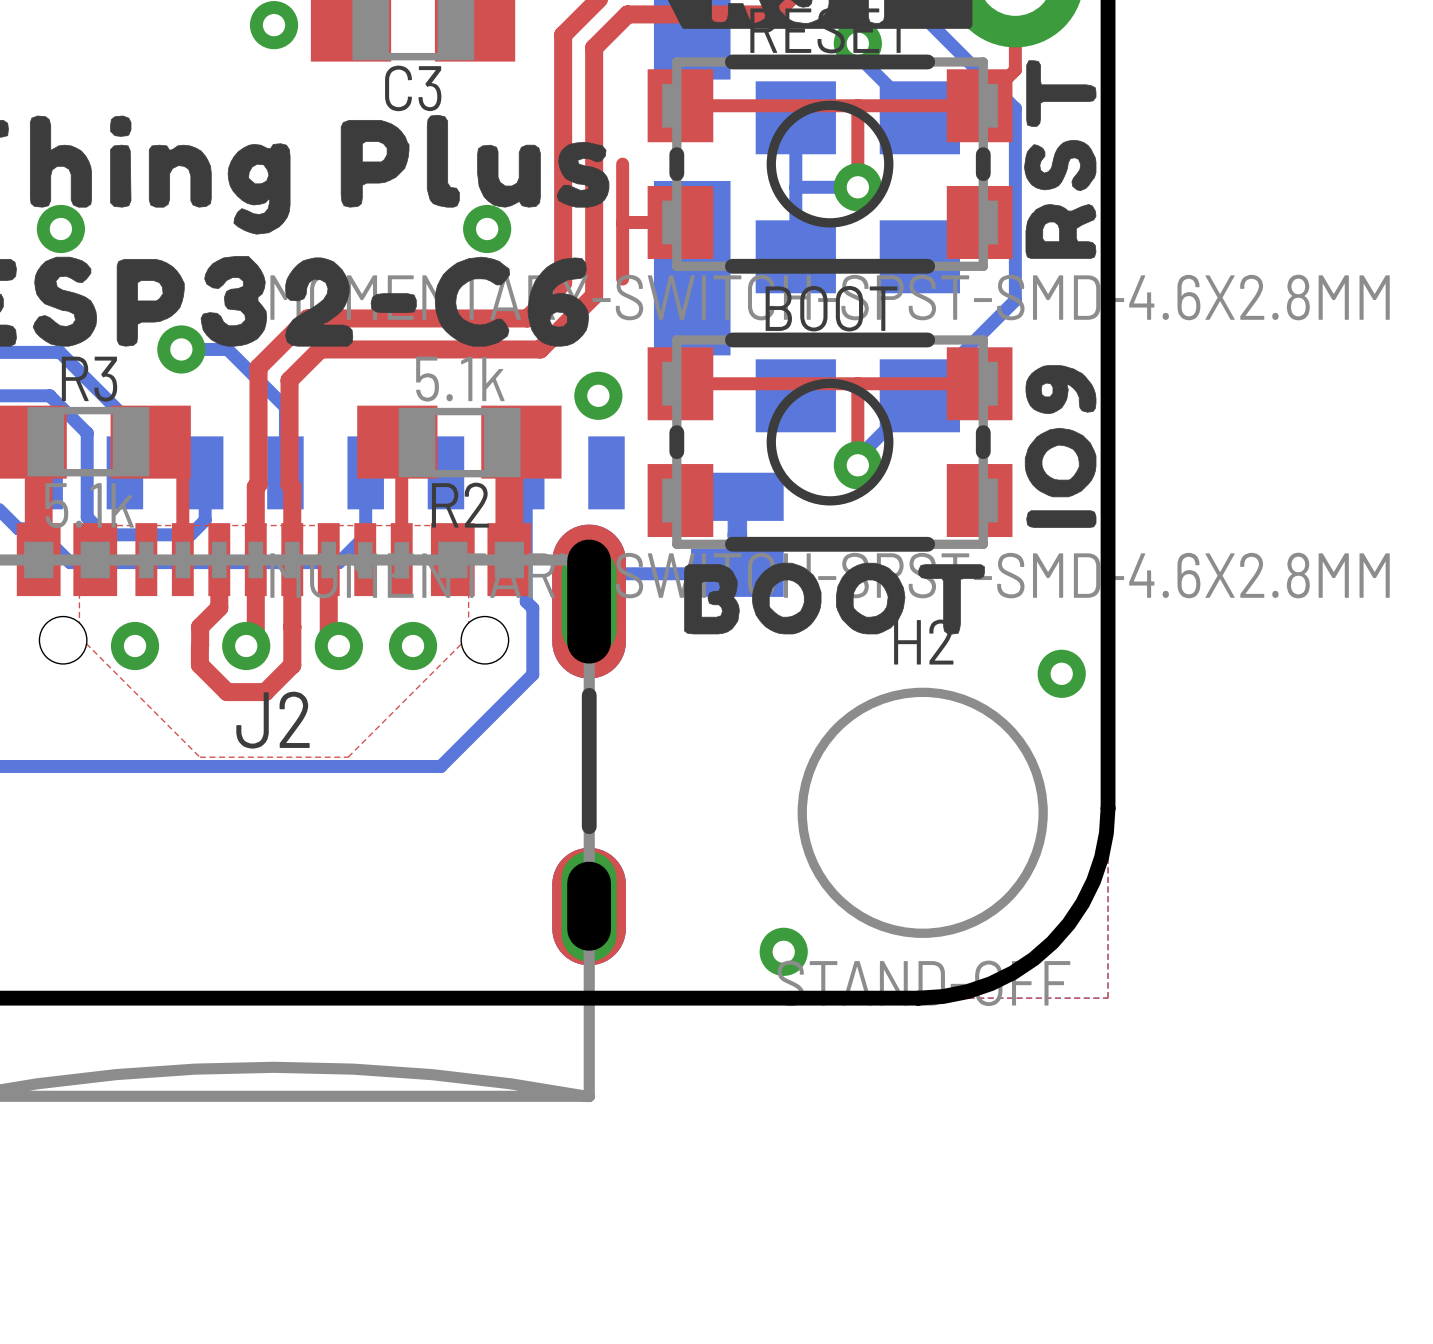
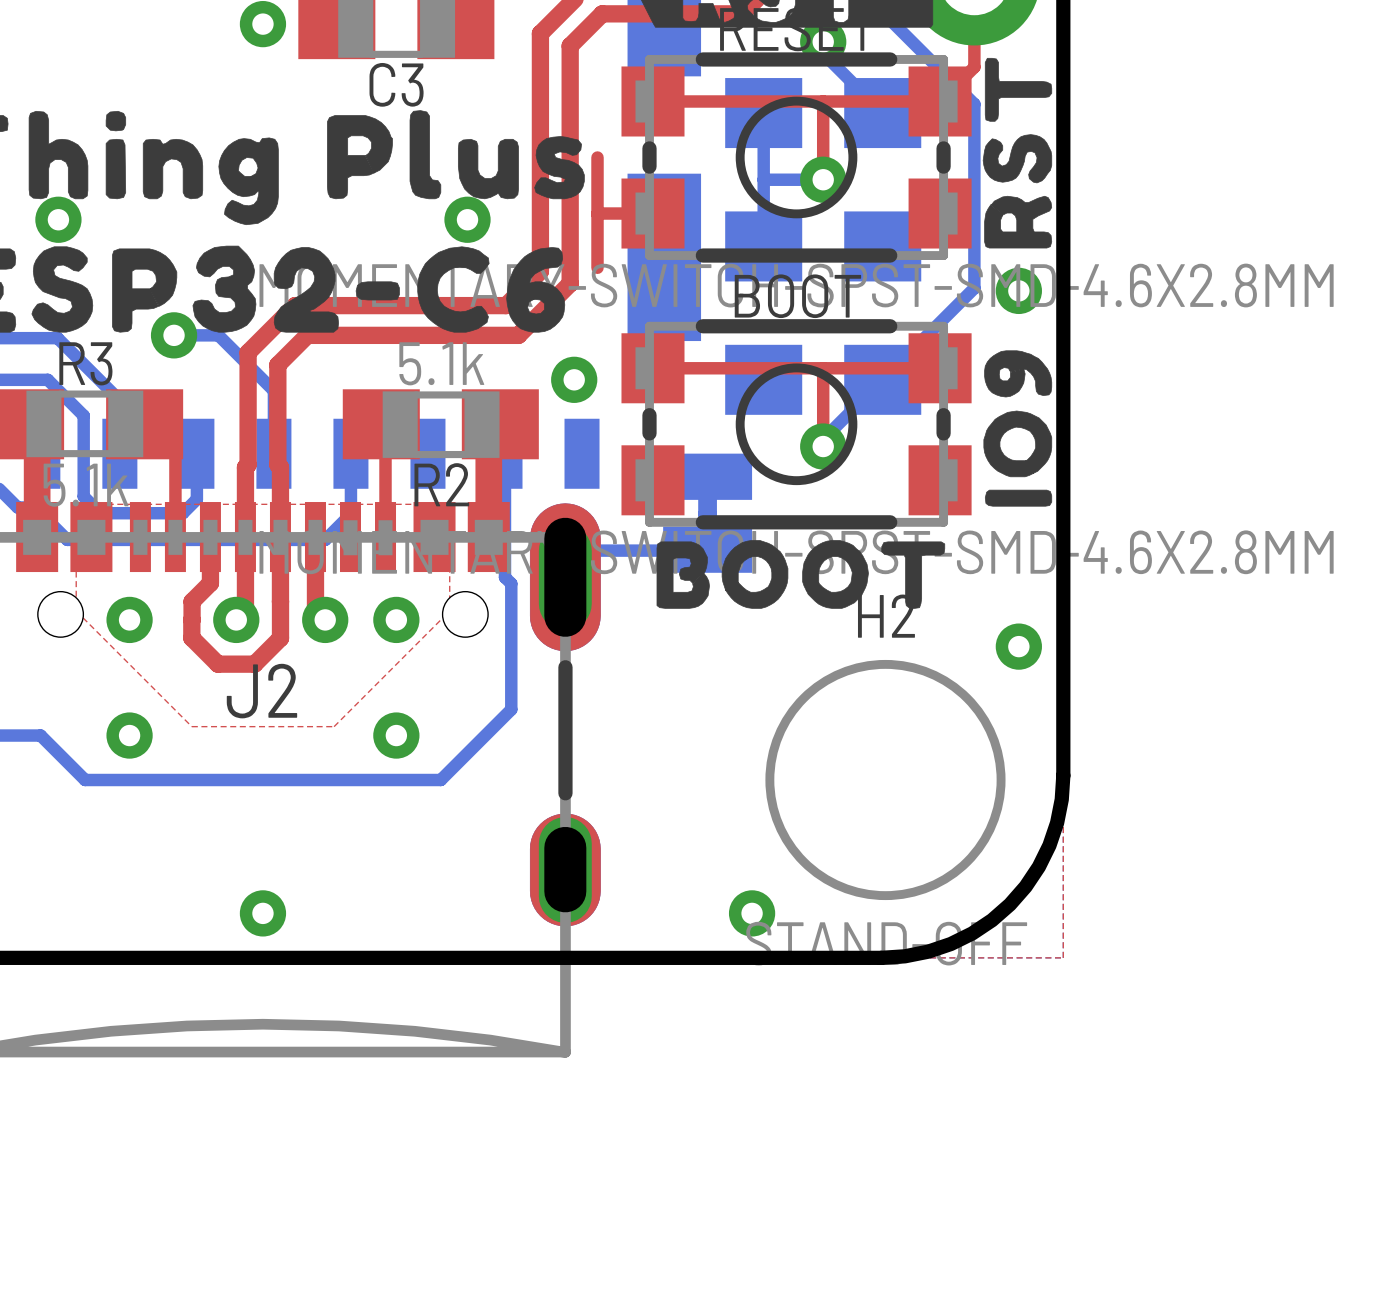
via: none -> (1018, 290)
bottom track: (532, 674) (440, 766) (42, 766) -> (511, 647) (511, 709) (440, 780) (85, 780) (40, 735)
via: none -> (129, 735)
via: none -> (396, 735)
via: none -> (262, 913)

